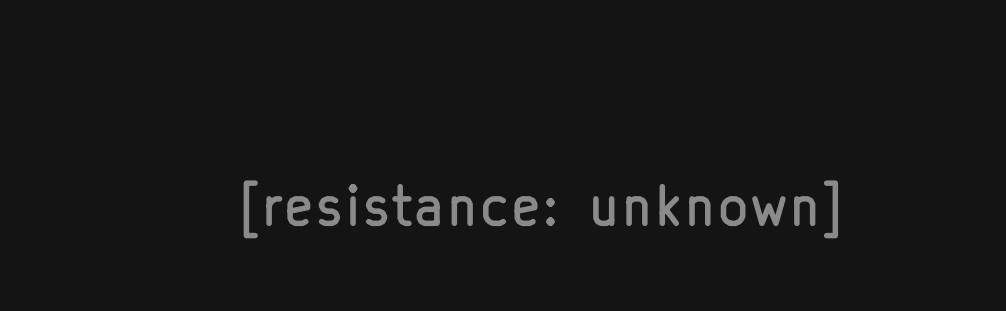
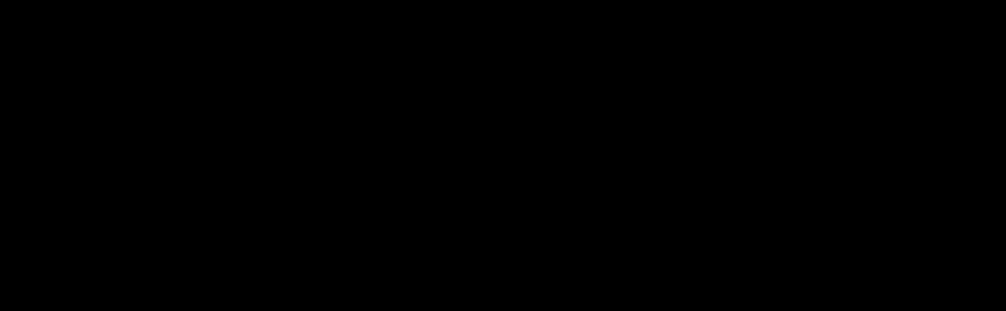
part value: [resistance: unknown] (540, 209) -> none

